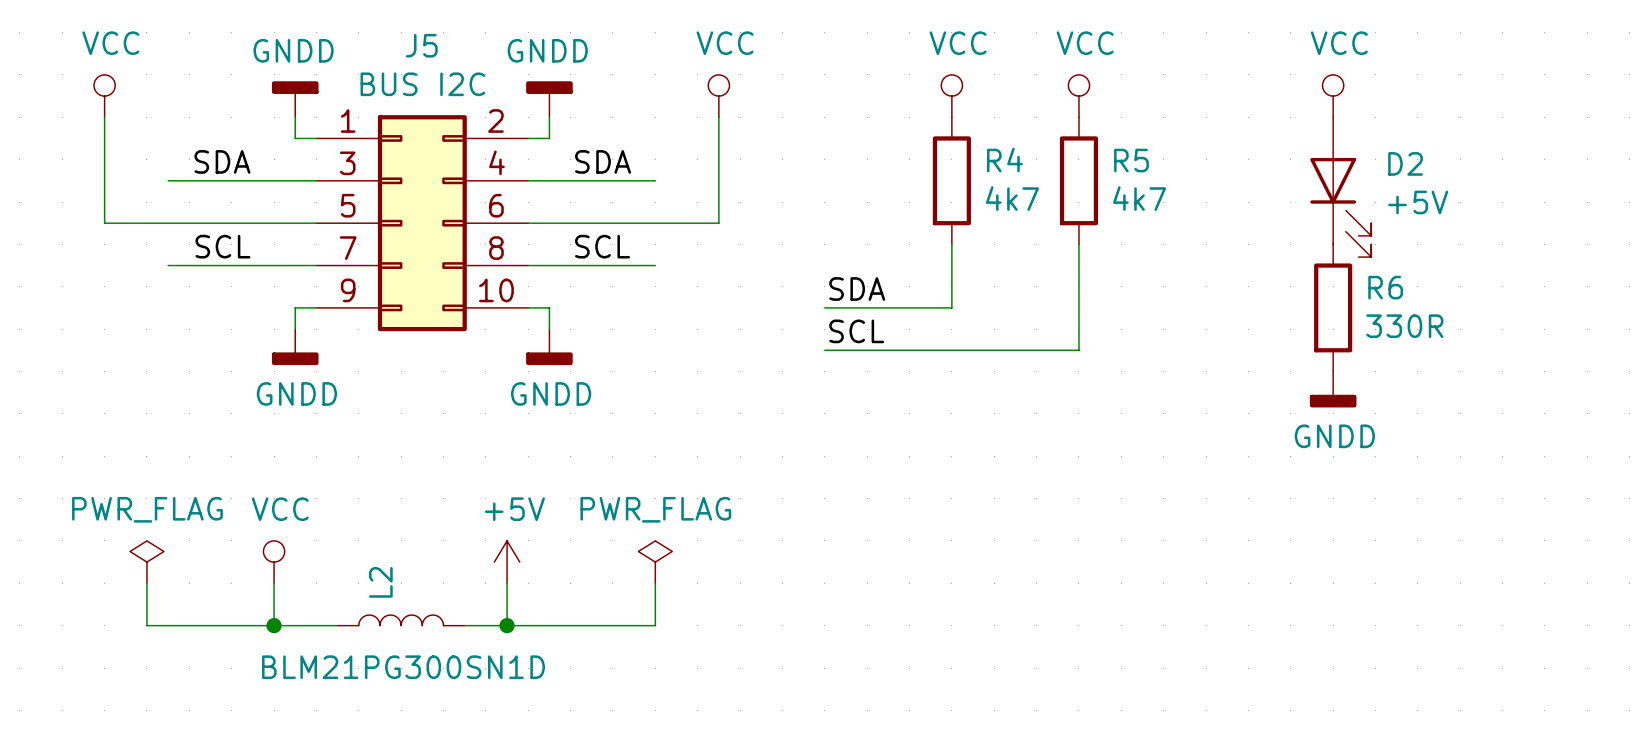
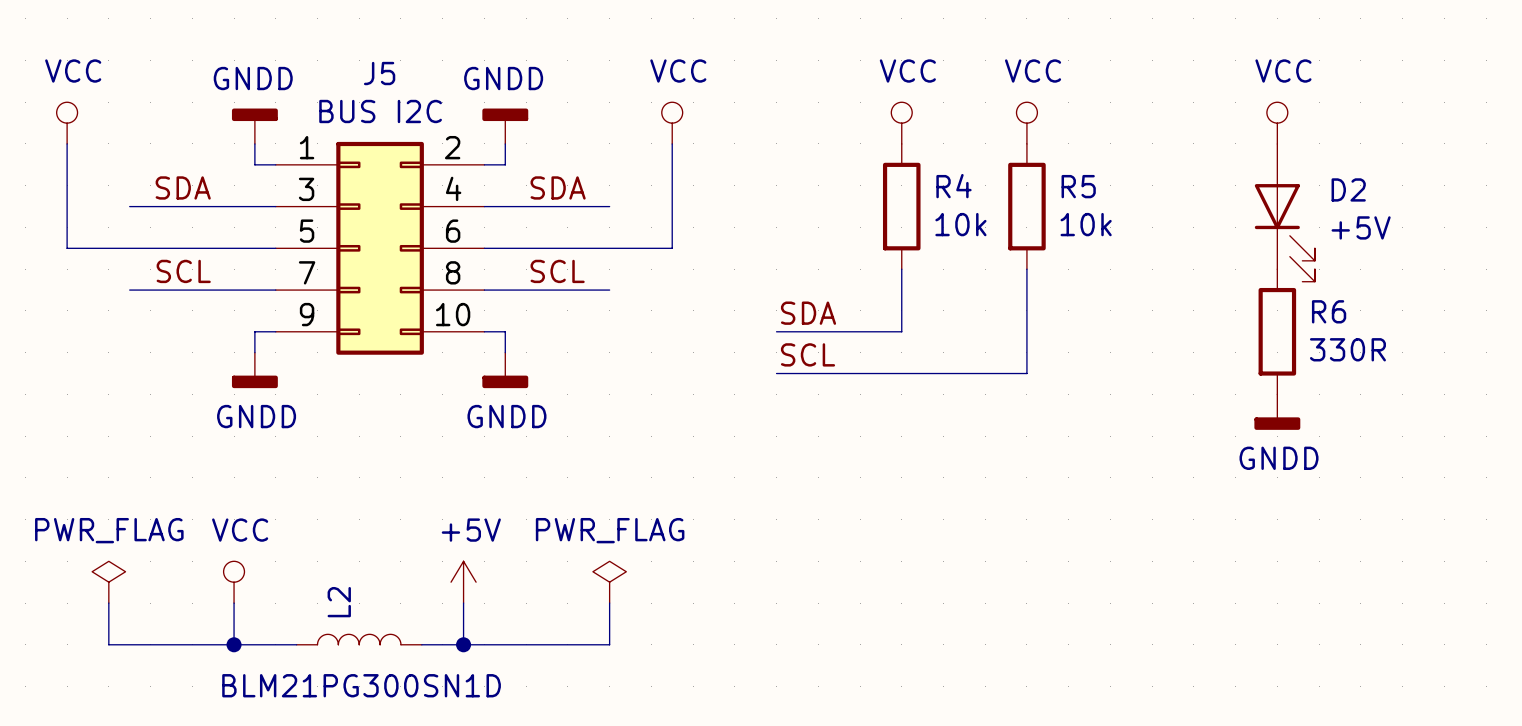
R4 value: 4k7 (1012, 198) -> 10k (960, 224)
R5 value: 4k7 (1139, 198) -> 10k (1086, 224)

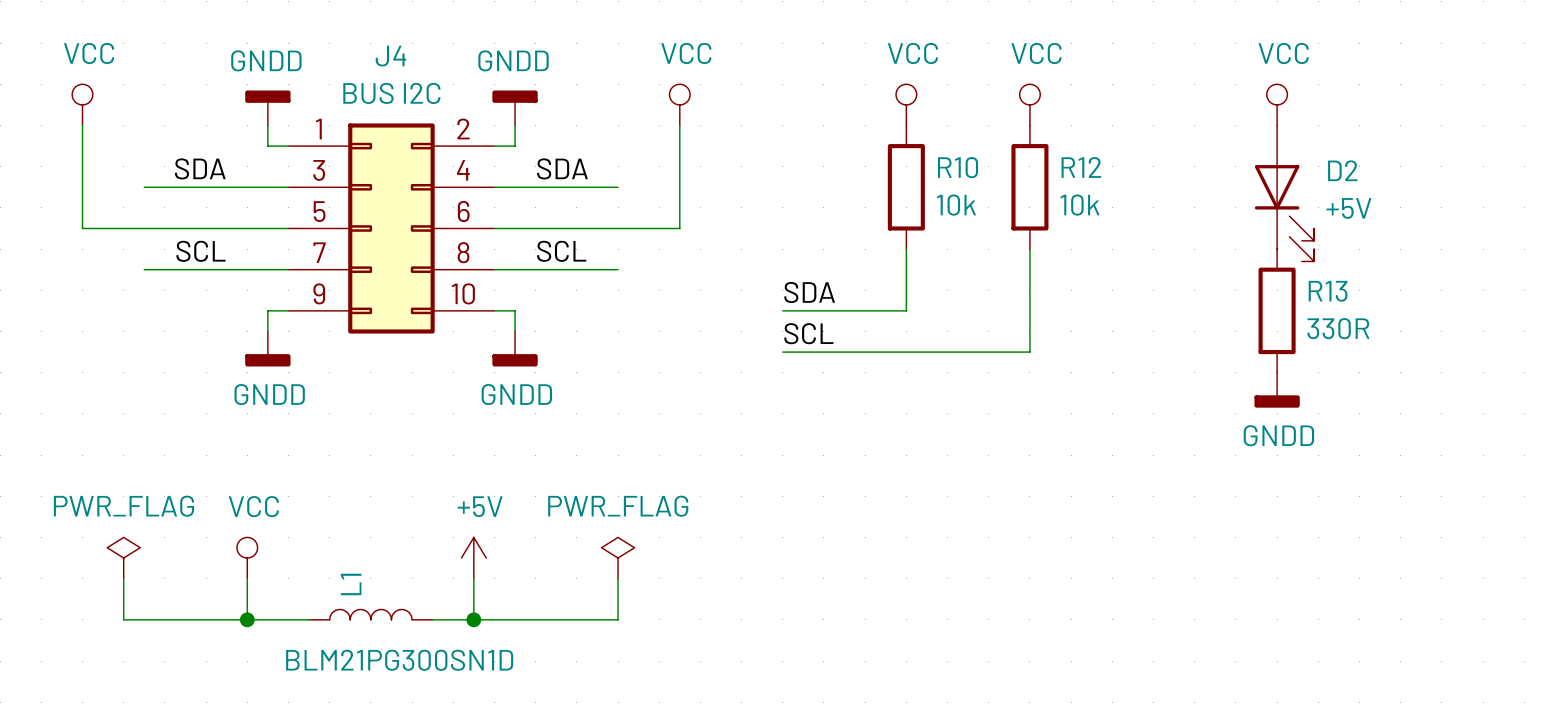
J5 name: J5 (379, 73) -> J4 (390, 56)
R4 name: R4 (953, 186) -> R10 (958, 167)
R5 name: R5 (1078, 186) -> R12 (1081, 167)
R6 name: R6 (1329, 311) -> R13 (1328, 291)
L2 name: L2 (339, 602) -> L1 (351, 584)

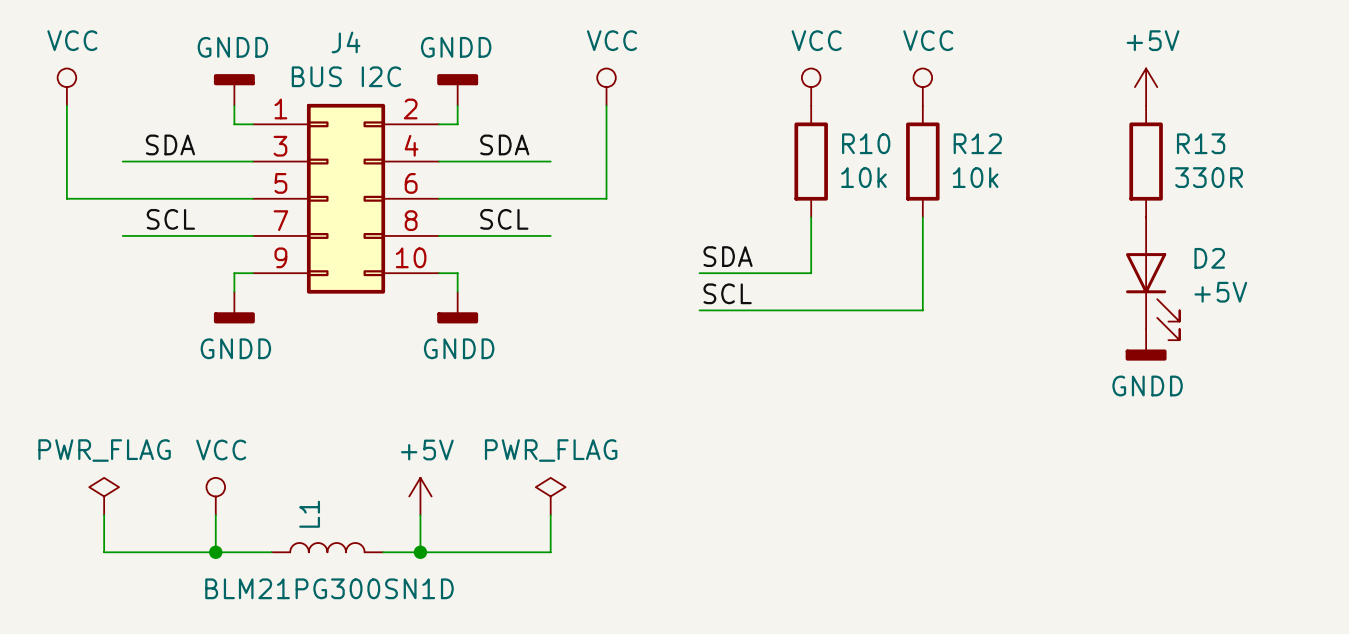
power symbol: VCC (1277, 104) -> +5V (1146, 87)
D2 position: (1284, 193) -> (1152, 278)
R13 position: (1277, 310) -> (1146, 161)

